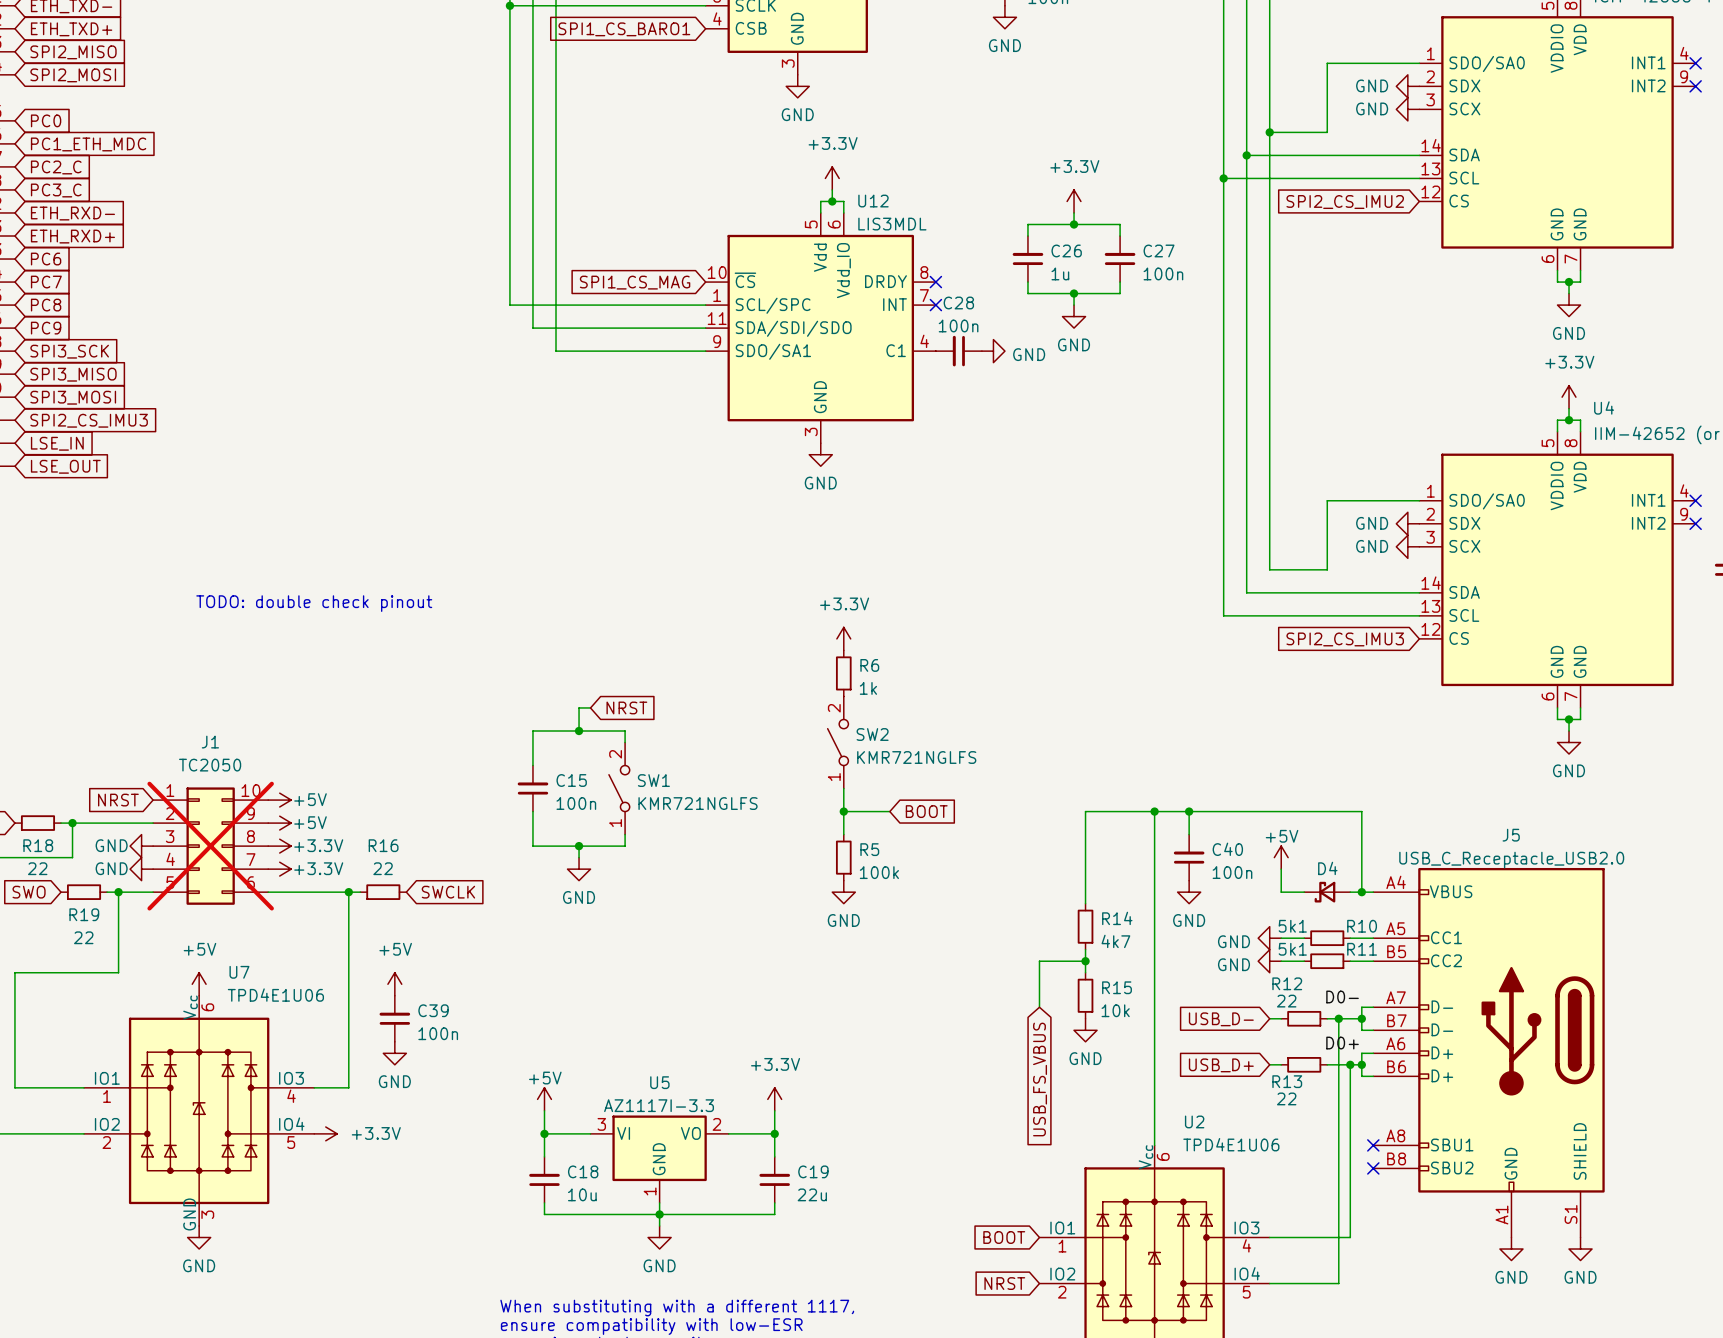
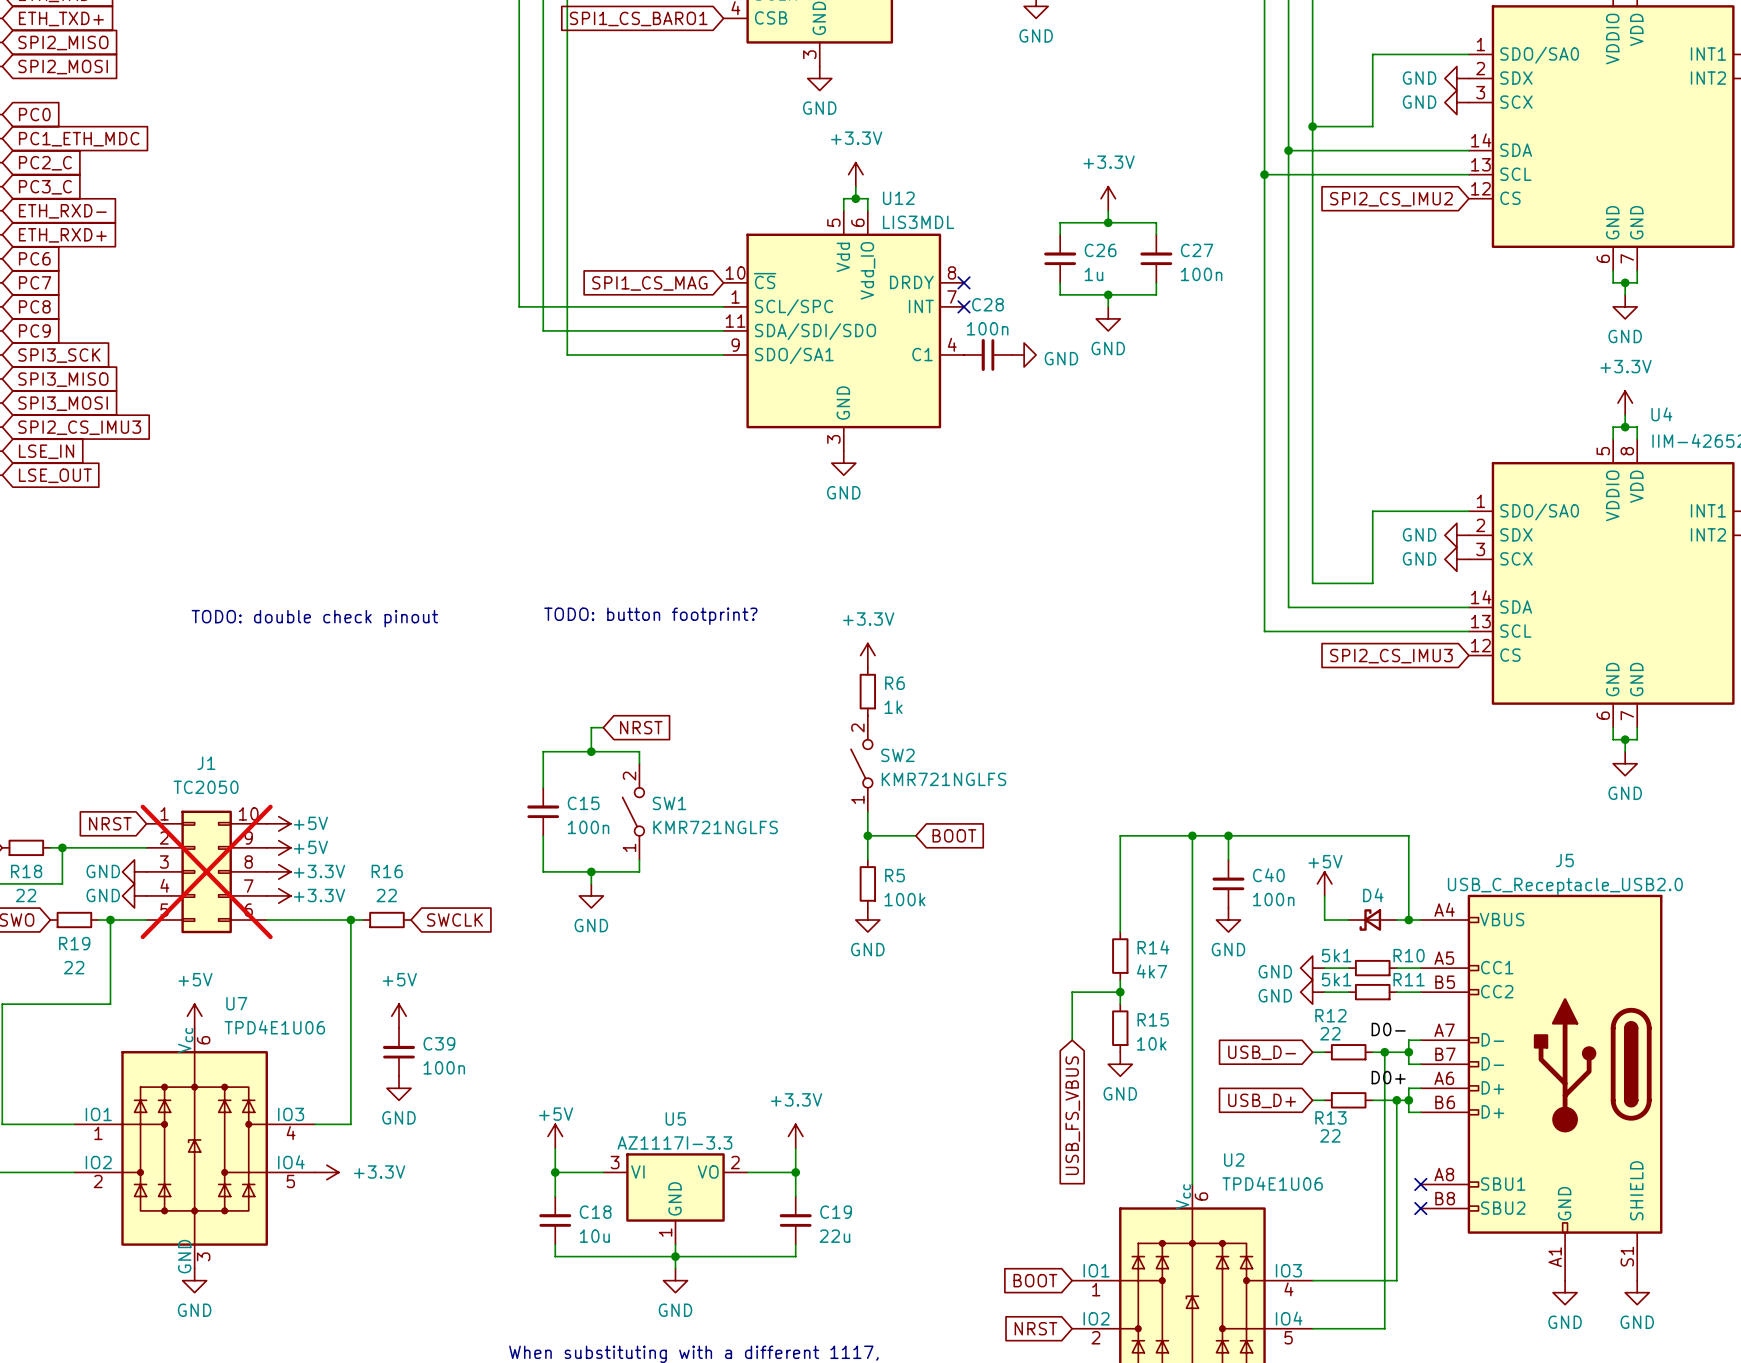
text: none -> TODO: button footprint? (650, 616)

